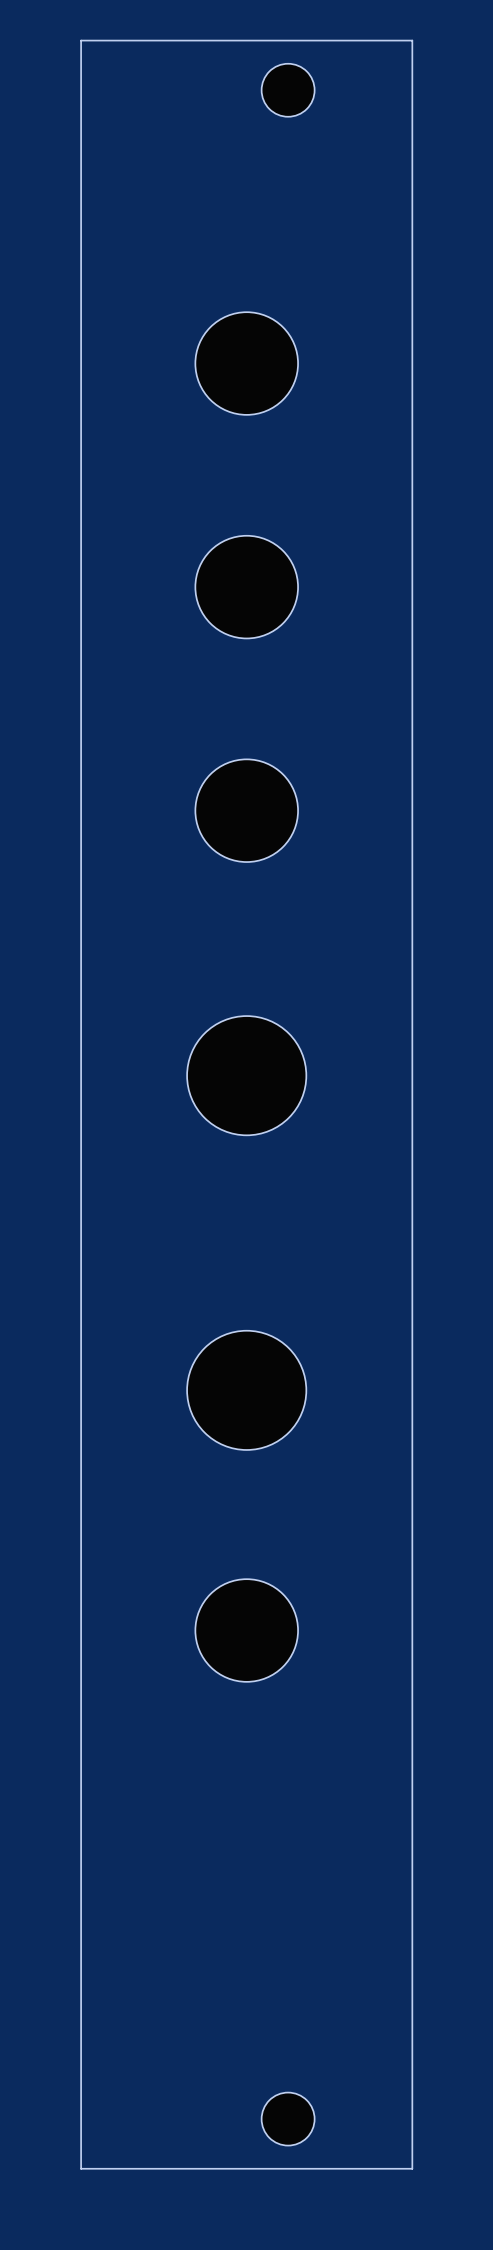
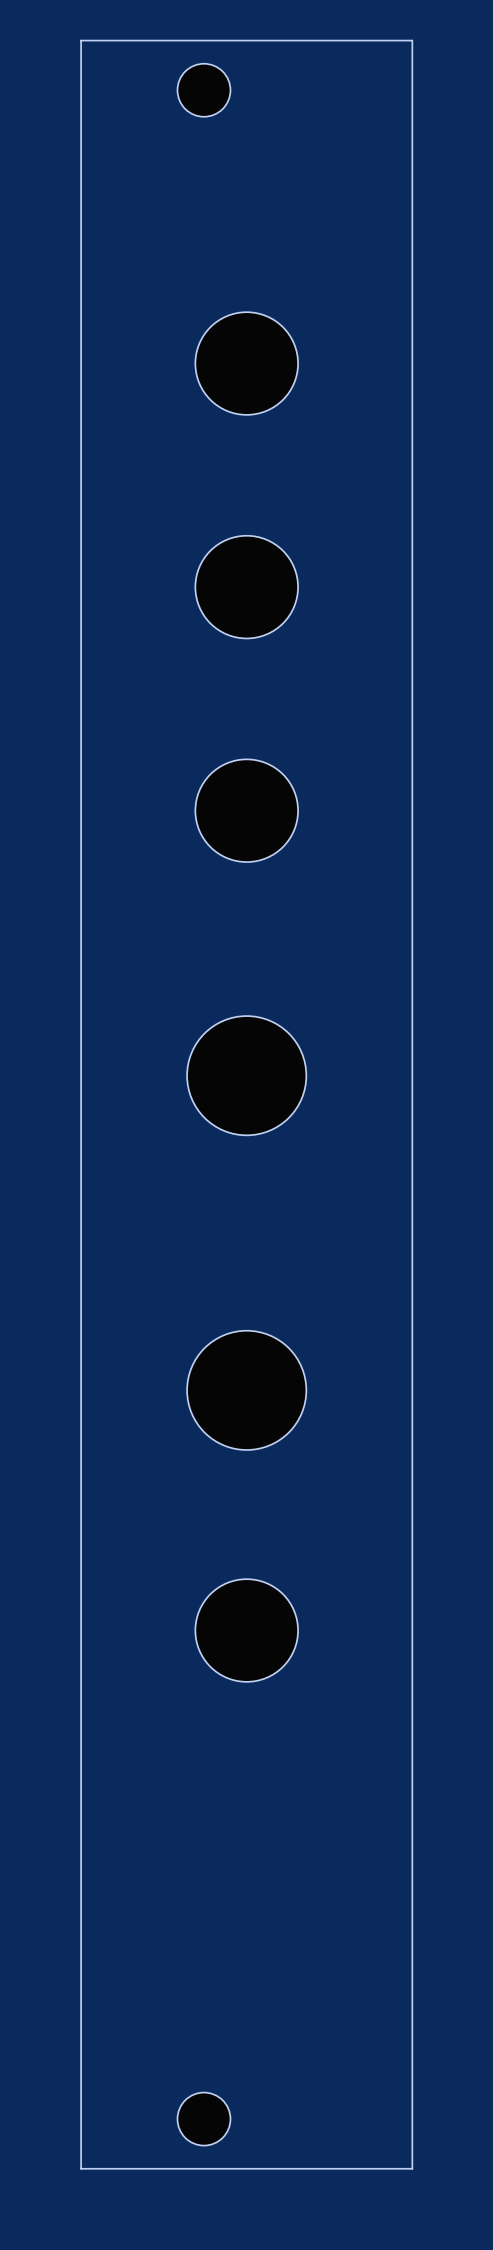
part position: (288, 90) -> (203, 90)
part position: (288, 2119) -> (203, 2119)

